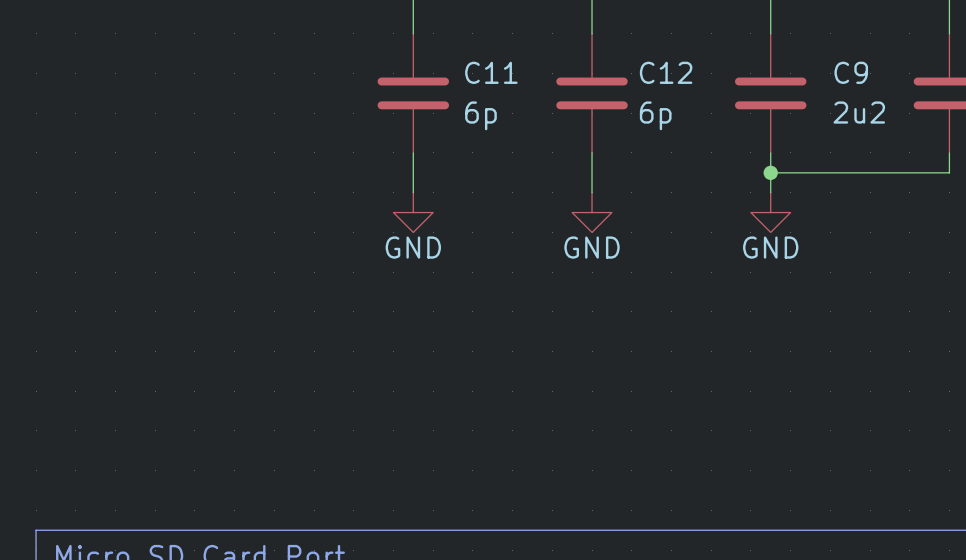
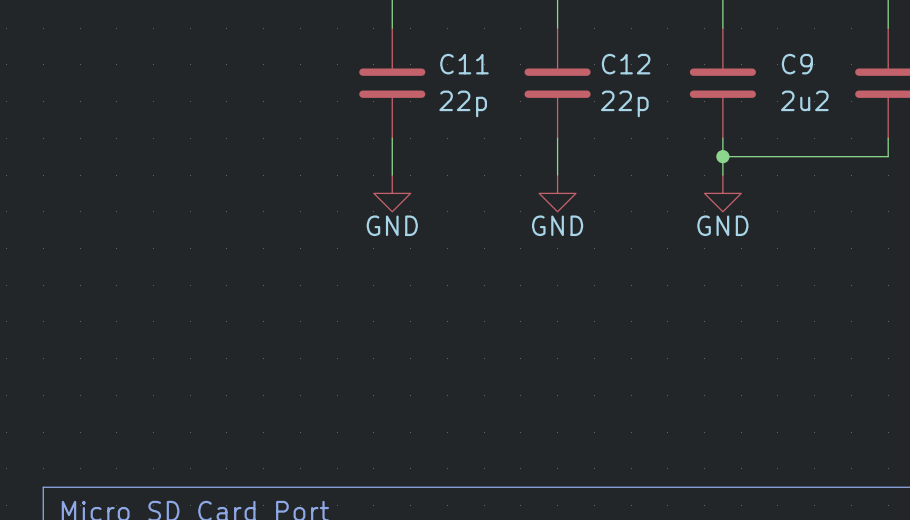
C11 value: 6p (480, 115) -> 22p (463, 103)
C12 value: 6p (655, 115) -> 22p (624, 103)

